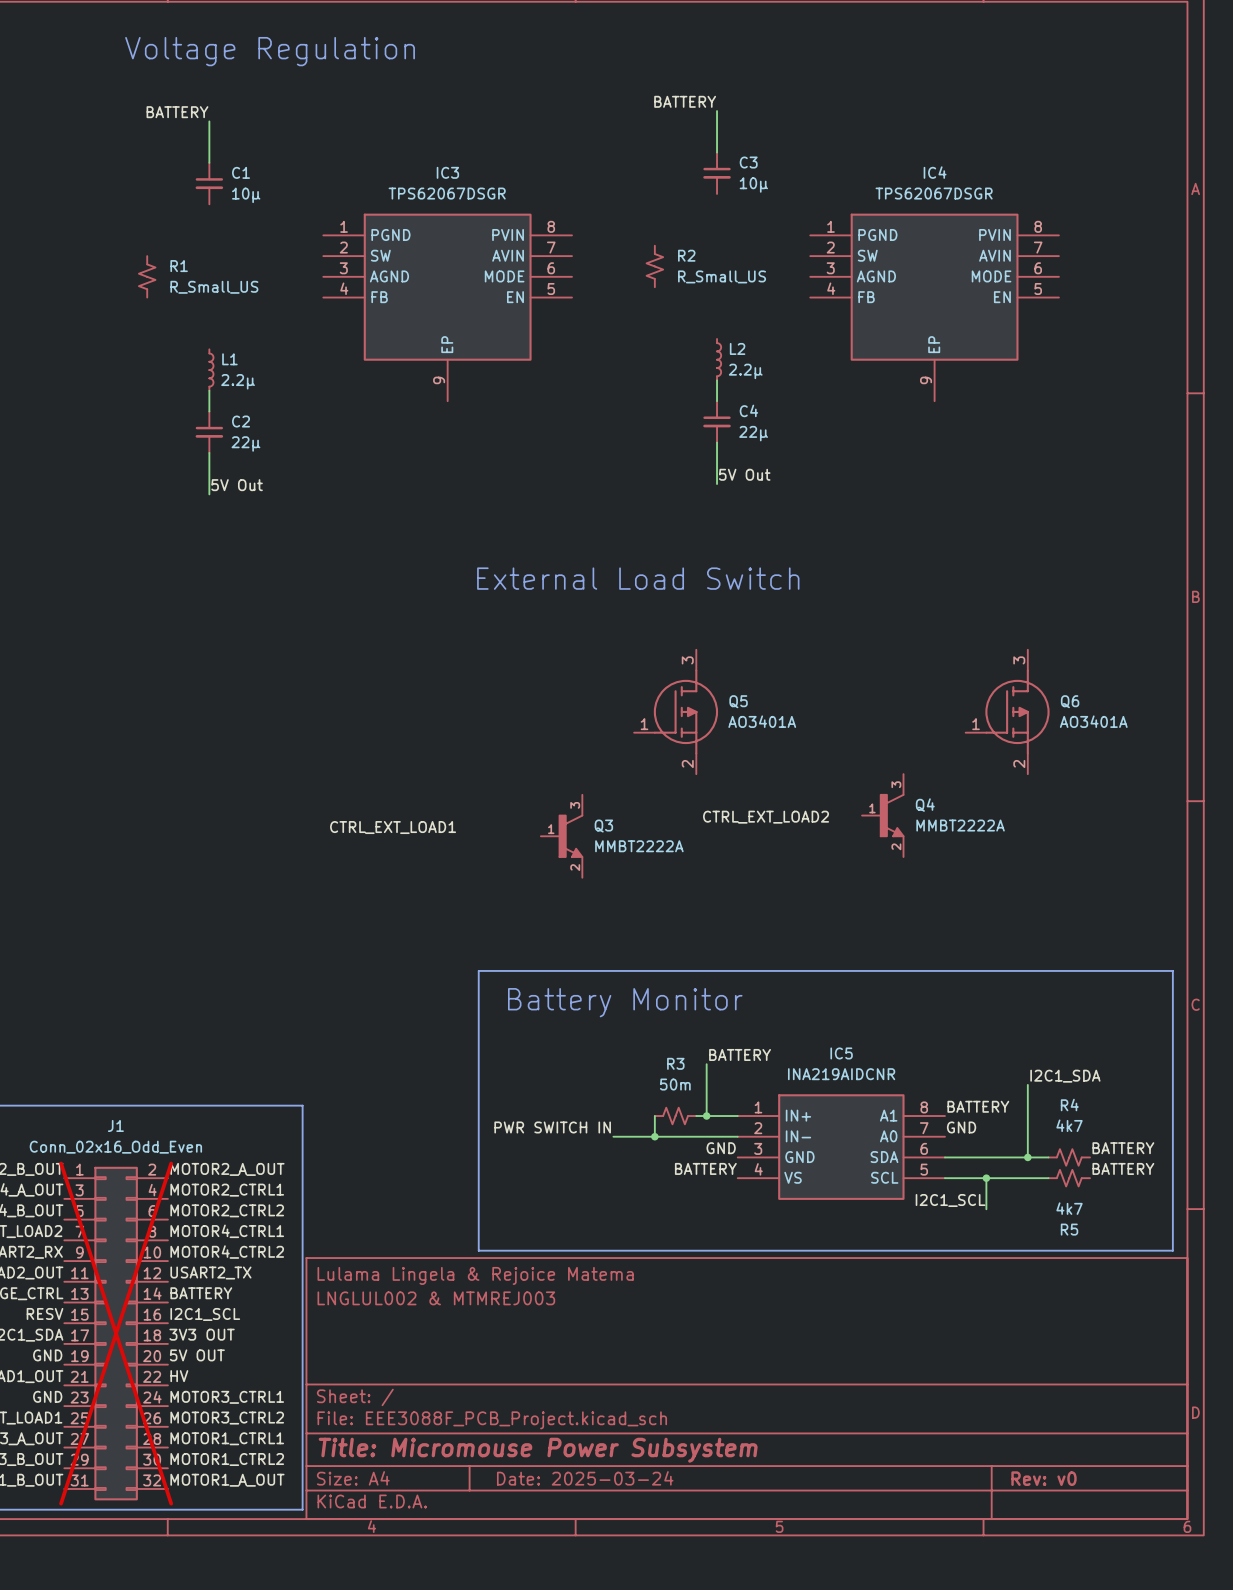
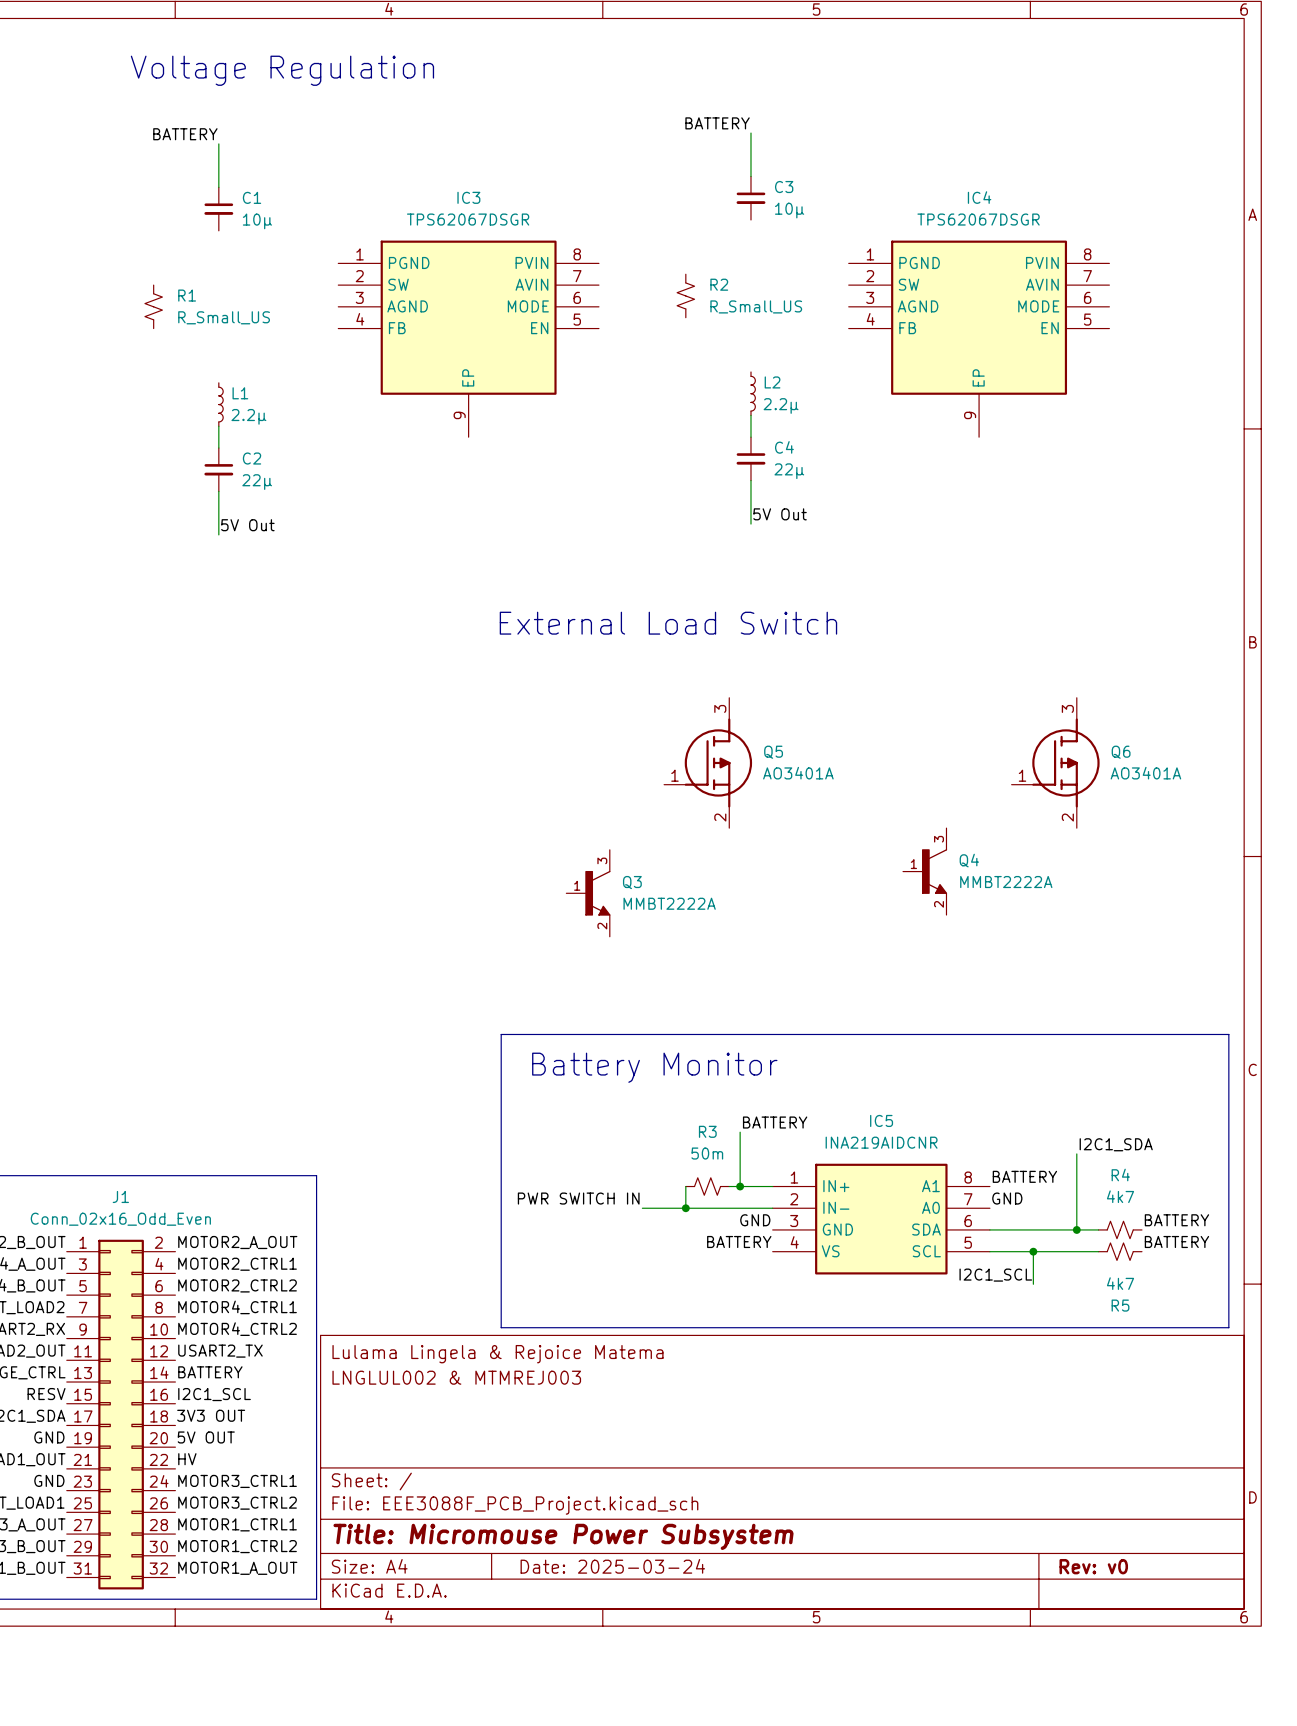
label: CTRL_EXT_LOAD2 (766, 817) -> none
label: CTRL_EXT_LOAD1 (393, 827) -> none
J1 do-not-place cross: (116, 1333) -> none

